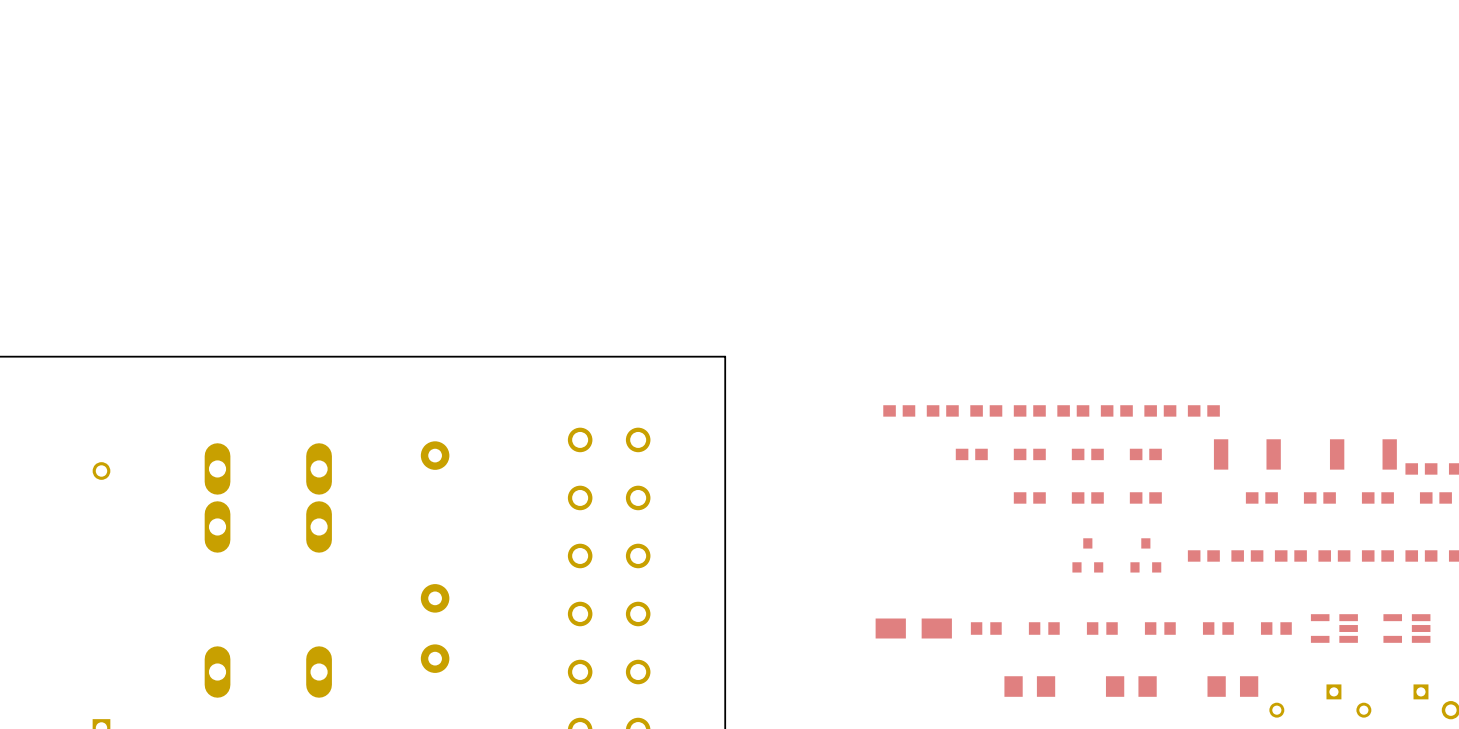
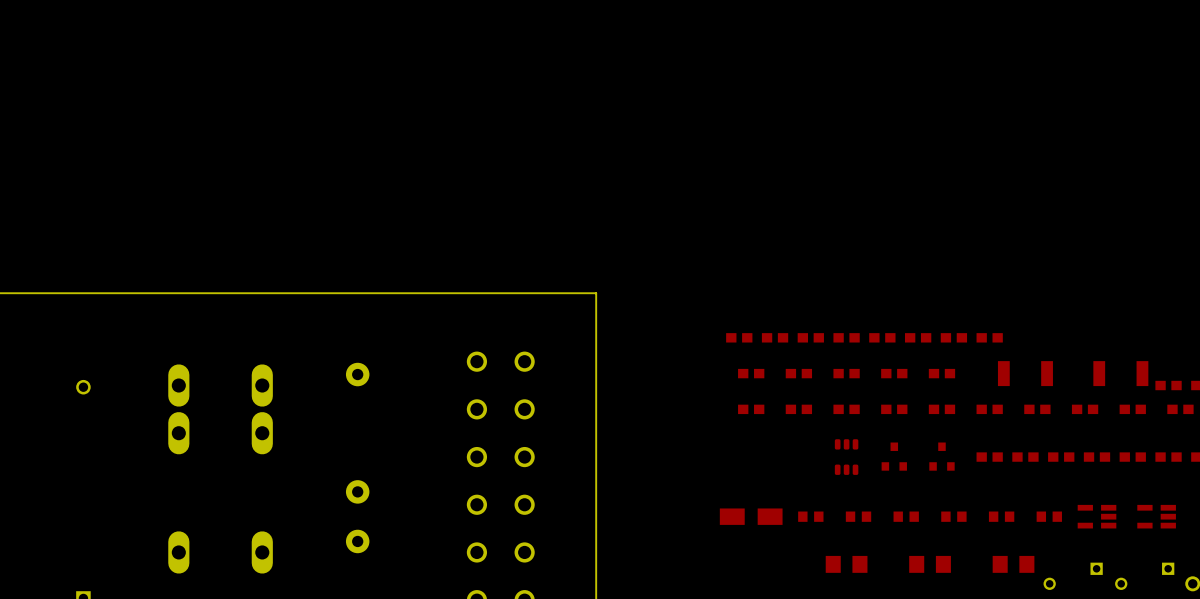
part: none -> (751, 373)
part: none -> (751, 409)
part: none -> (798, 409)
part: none -> (989, 409)
part: none -> (846, 457)

